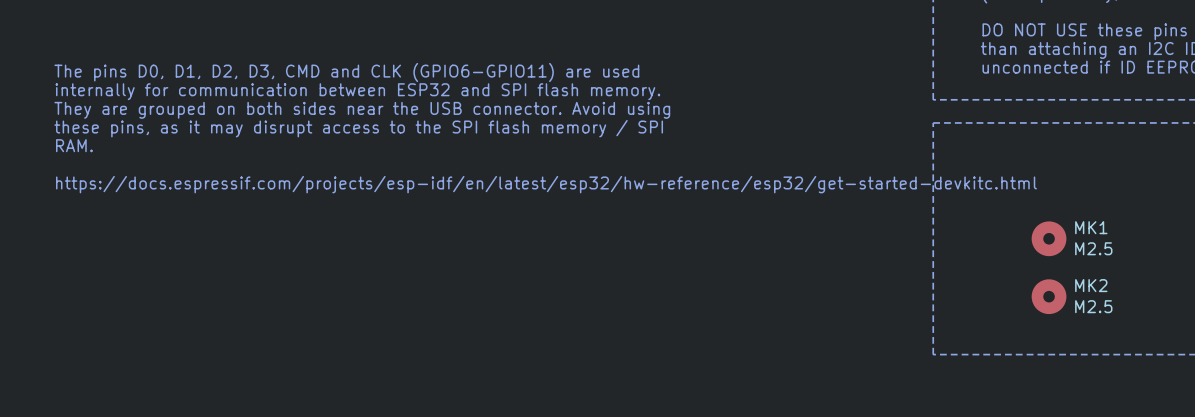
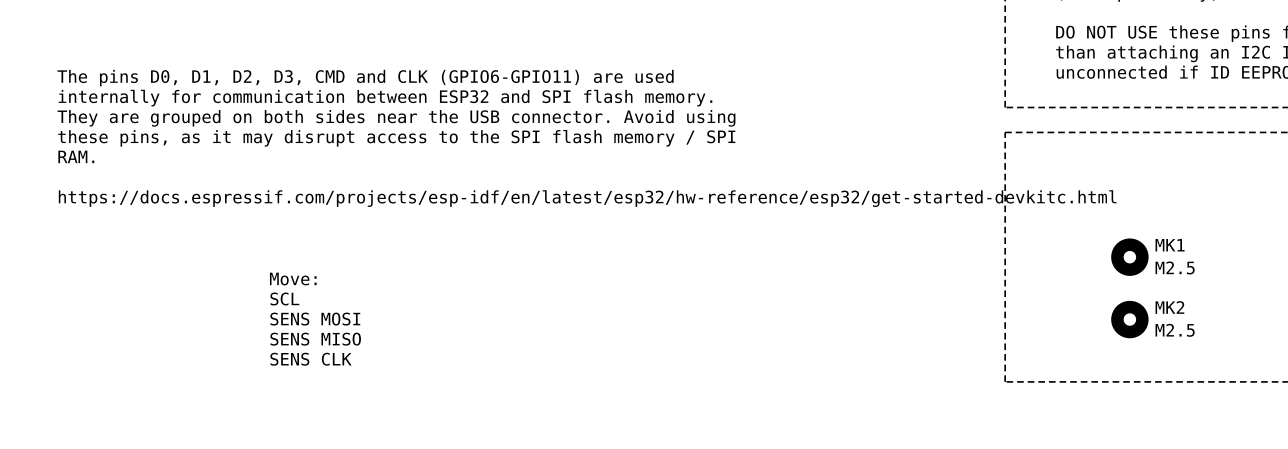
text: none -> Move: (293, 279)
text: none -> SCL (284, 298)
text: none -> SENS MOSI (315, 319)
text: none -> SENS MISO (315, 339)
text: none -> SENS CLK (310, 359)

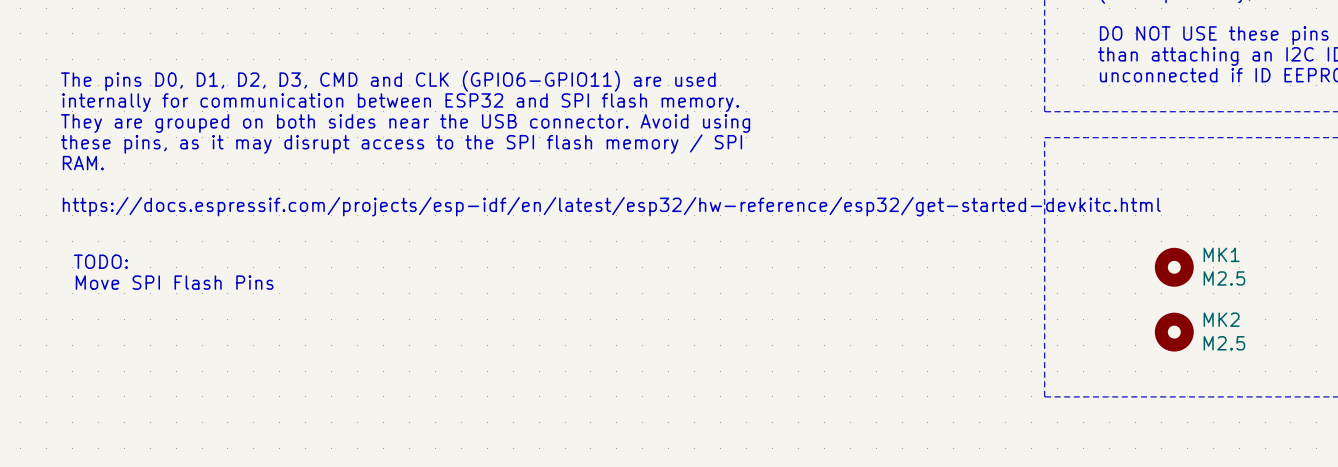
text: none -> TODO: (100, 261)
text: none -> Move SPI Flash Pins (174, 282)
text: Move: (293, 279) -> none
text: SCL (284, 298) -> none
text: SENS MOSI (315, 319) -> none
text: SENS MISO (315, 339) -> none
text: SENS CLK (310, 359) -> none

